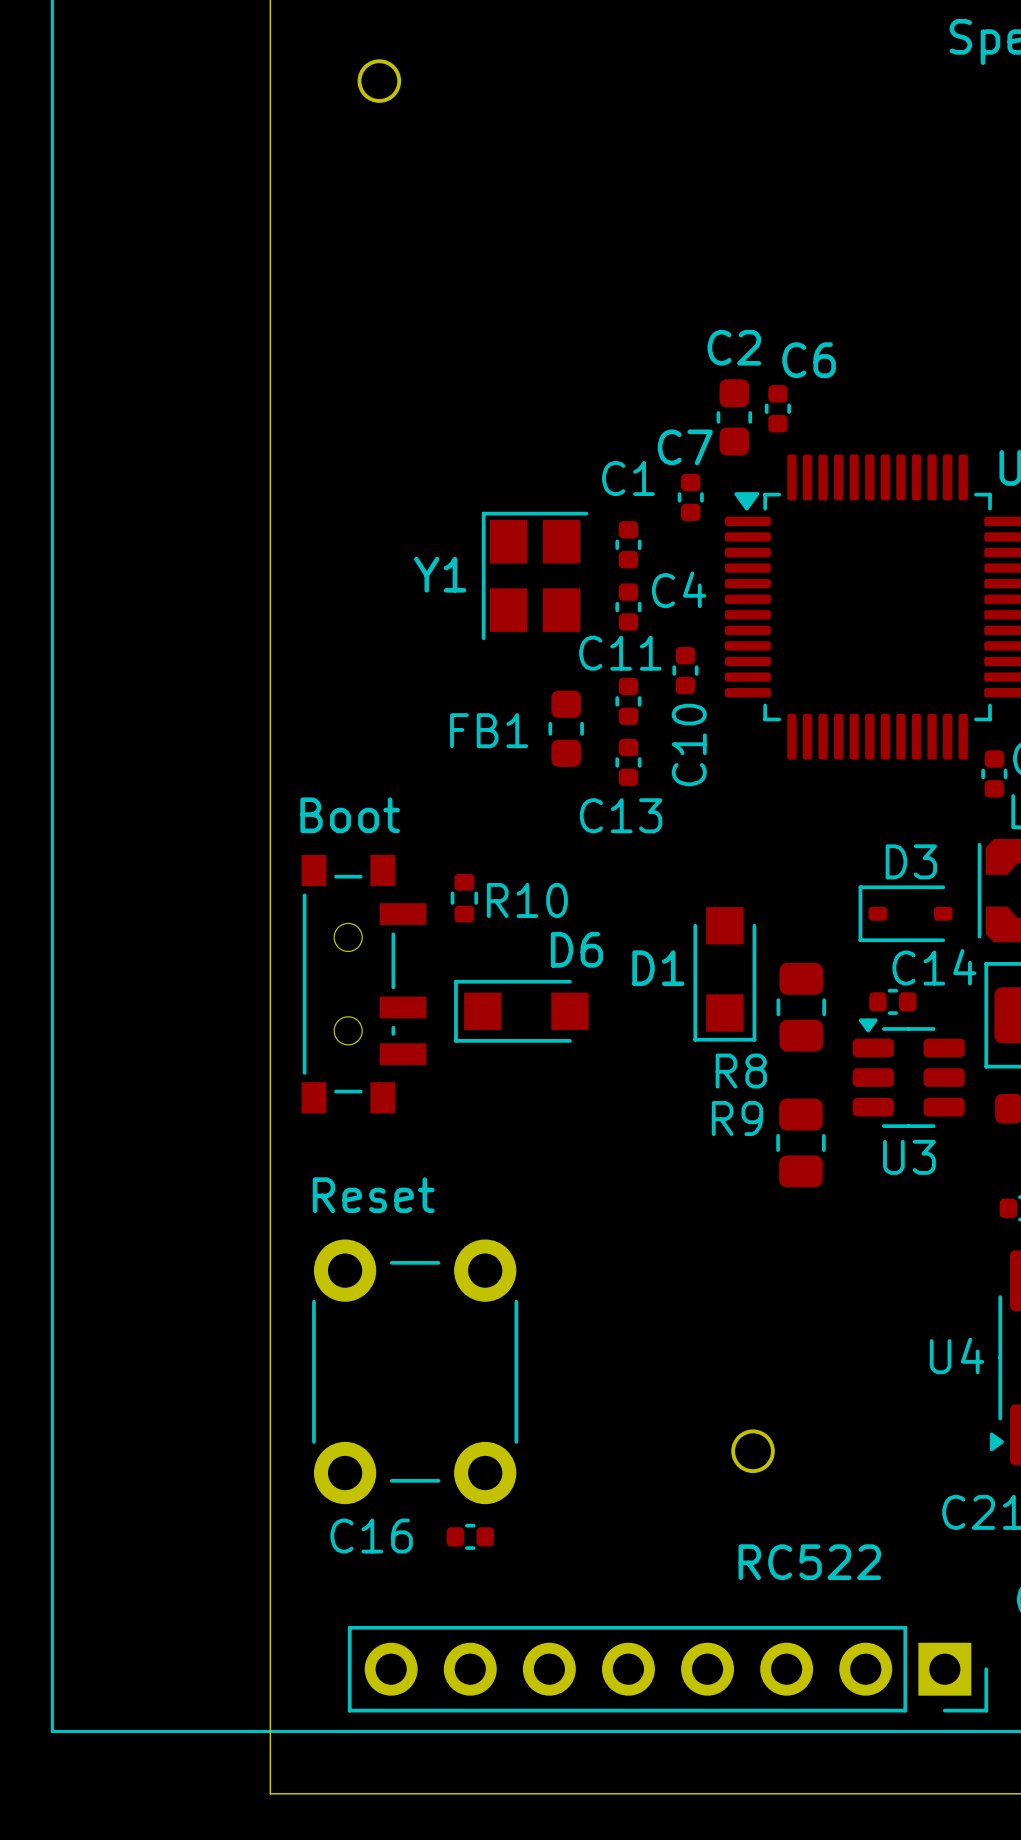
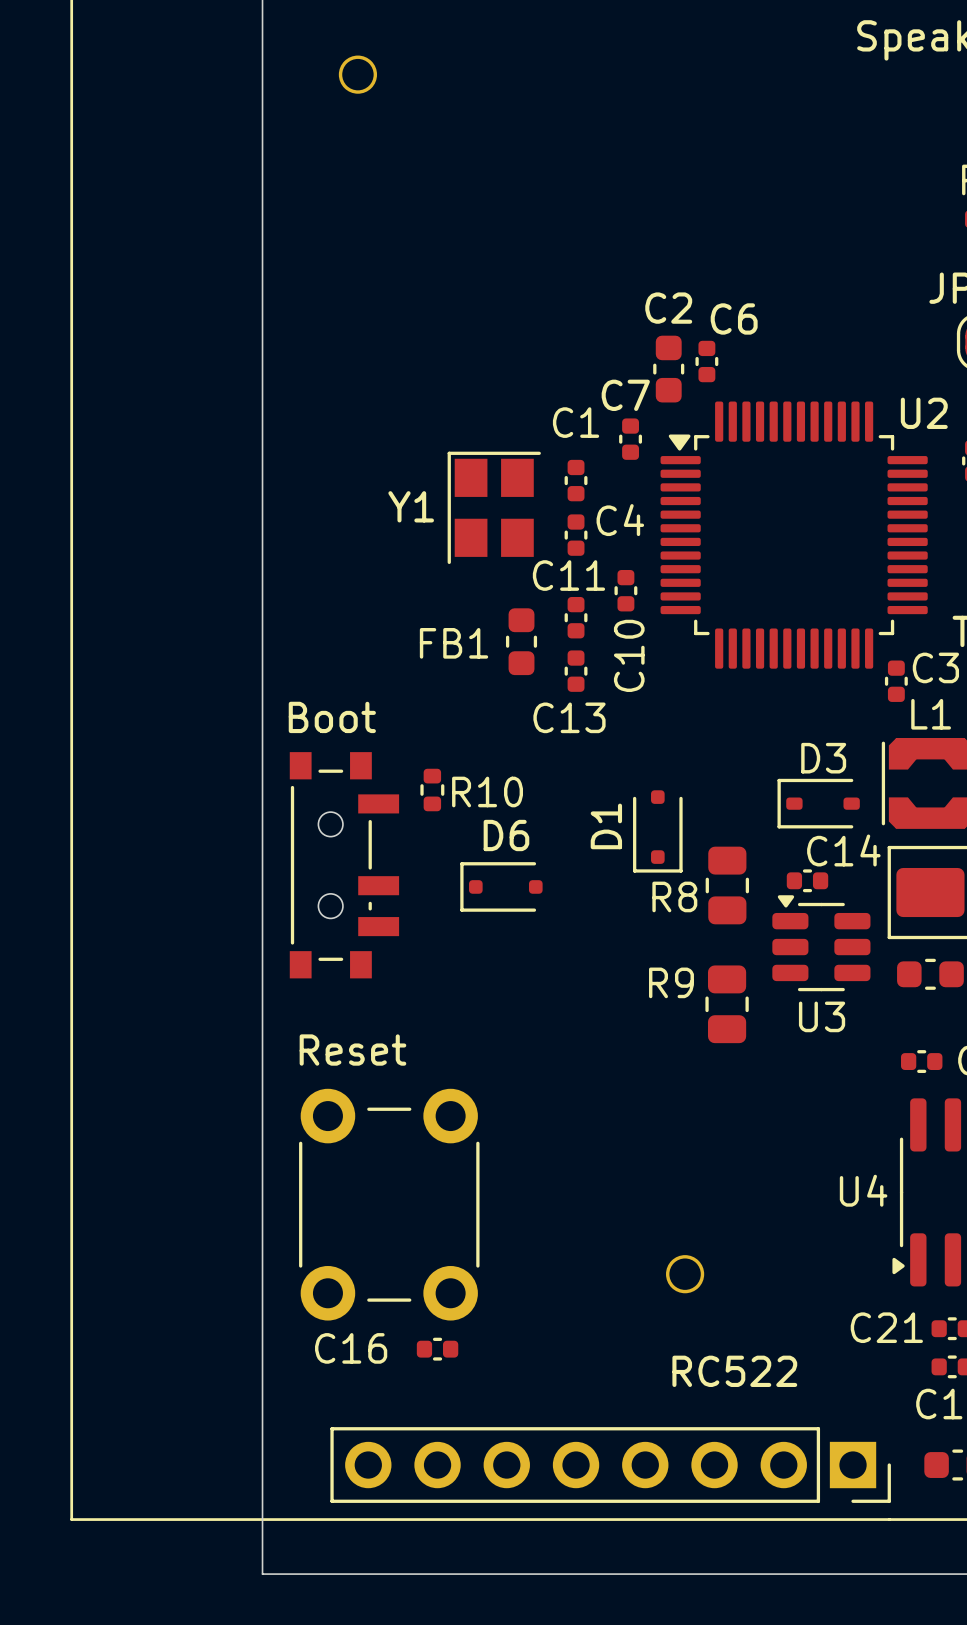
D1 footprint: [693, 907, 757, 1042] -> [633, 790, 683, 873]
D6 footprint: [454, 979, 589, 1043] -> [460, 862, 543, 912]
R8 name position: R8 (741, 1071) -> R8 (674, 896)

